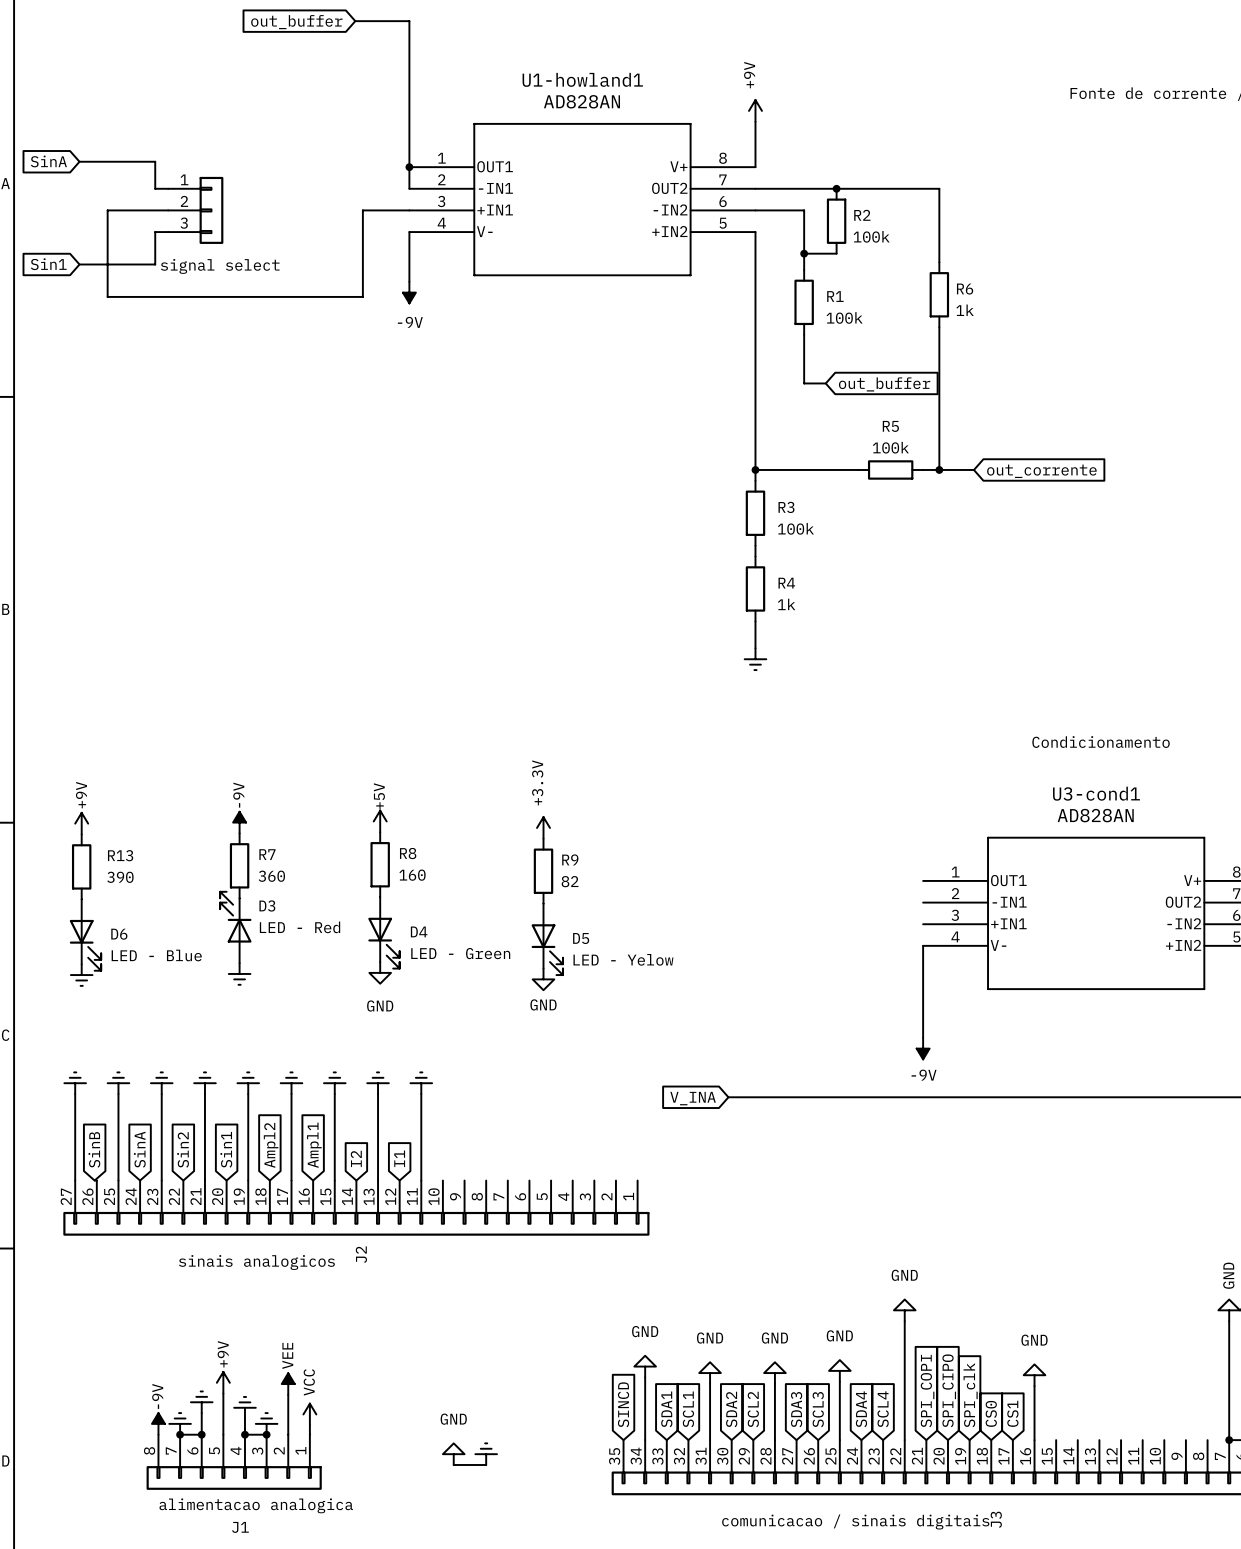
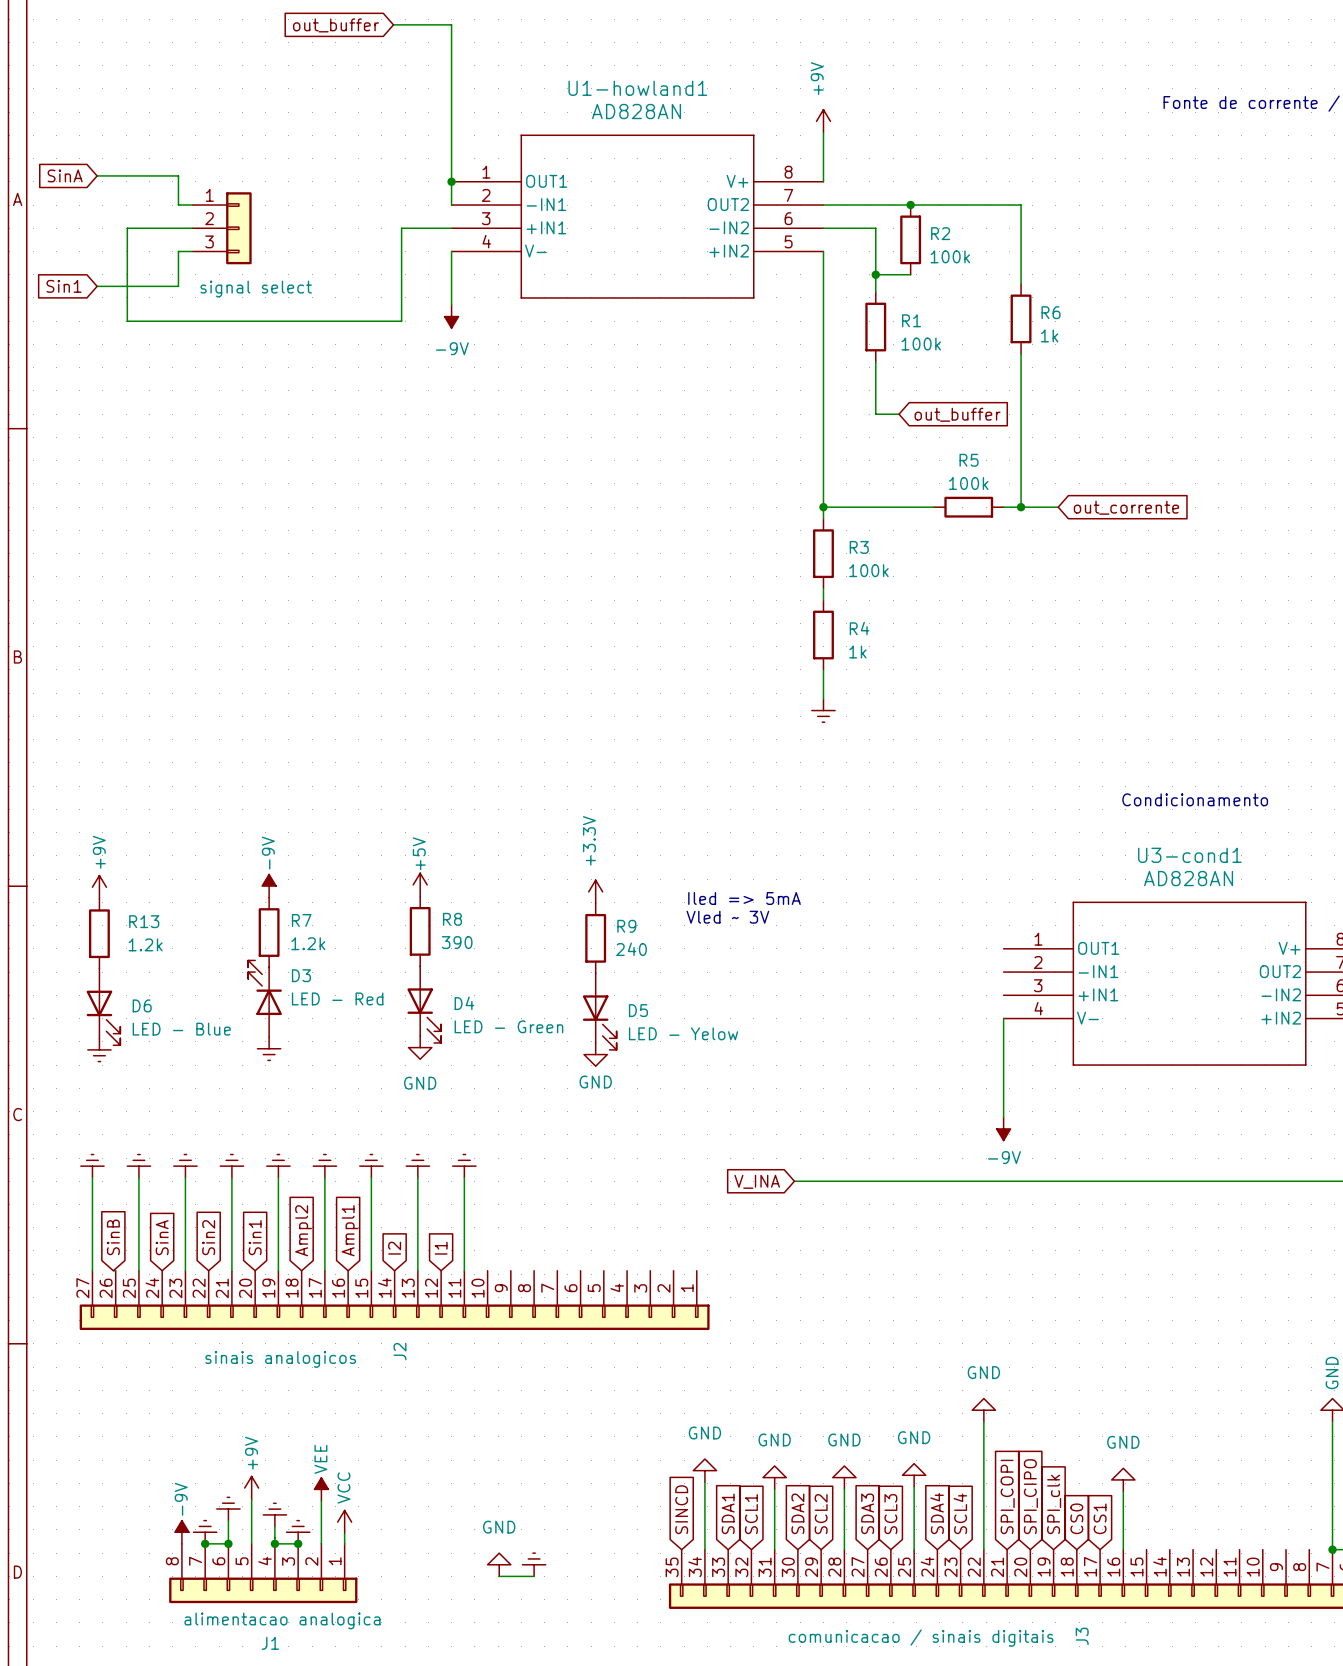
text: none -> Iled => 5mA (744, 898)
text: none -> Vled ~ 3V (727, 917)
R8 value: 160 (412, 875) -> 390 (457, 942)
R7 value: 360 (271, 876) -> 1.2k (308, 943)
R13 value: 390 (120, 877) -> 1.2k (145, 944)
R9 value: 82 (570, 881) -> 240 (631, 949)

